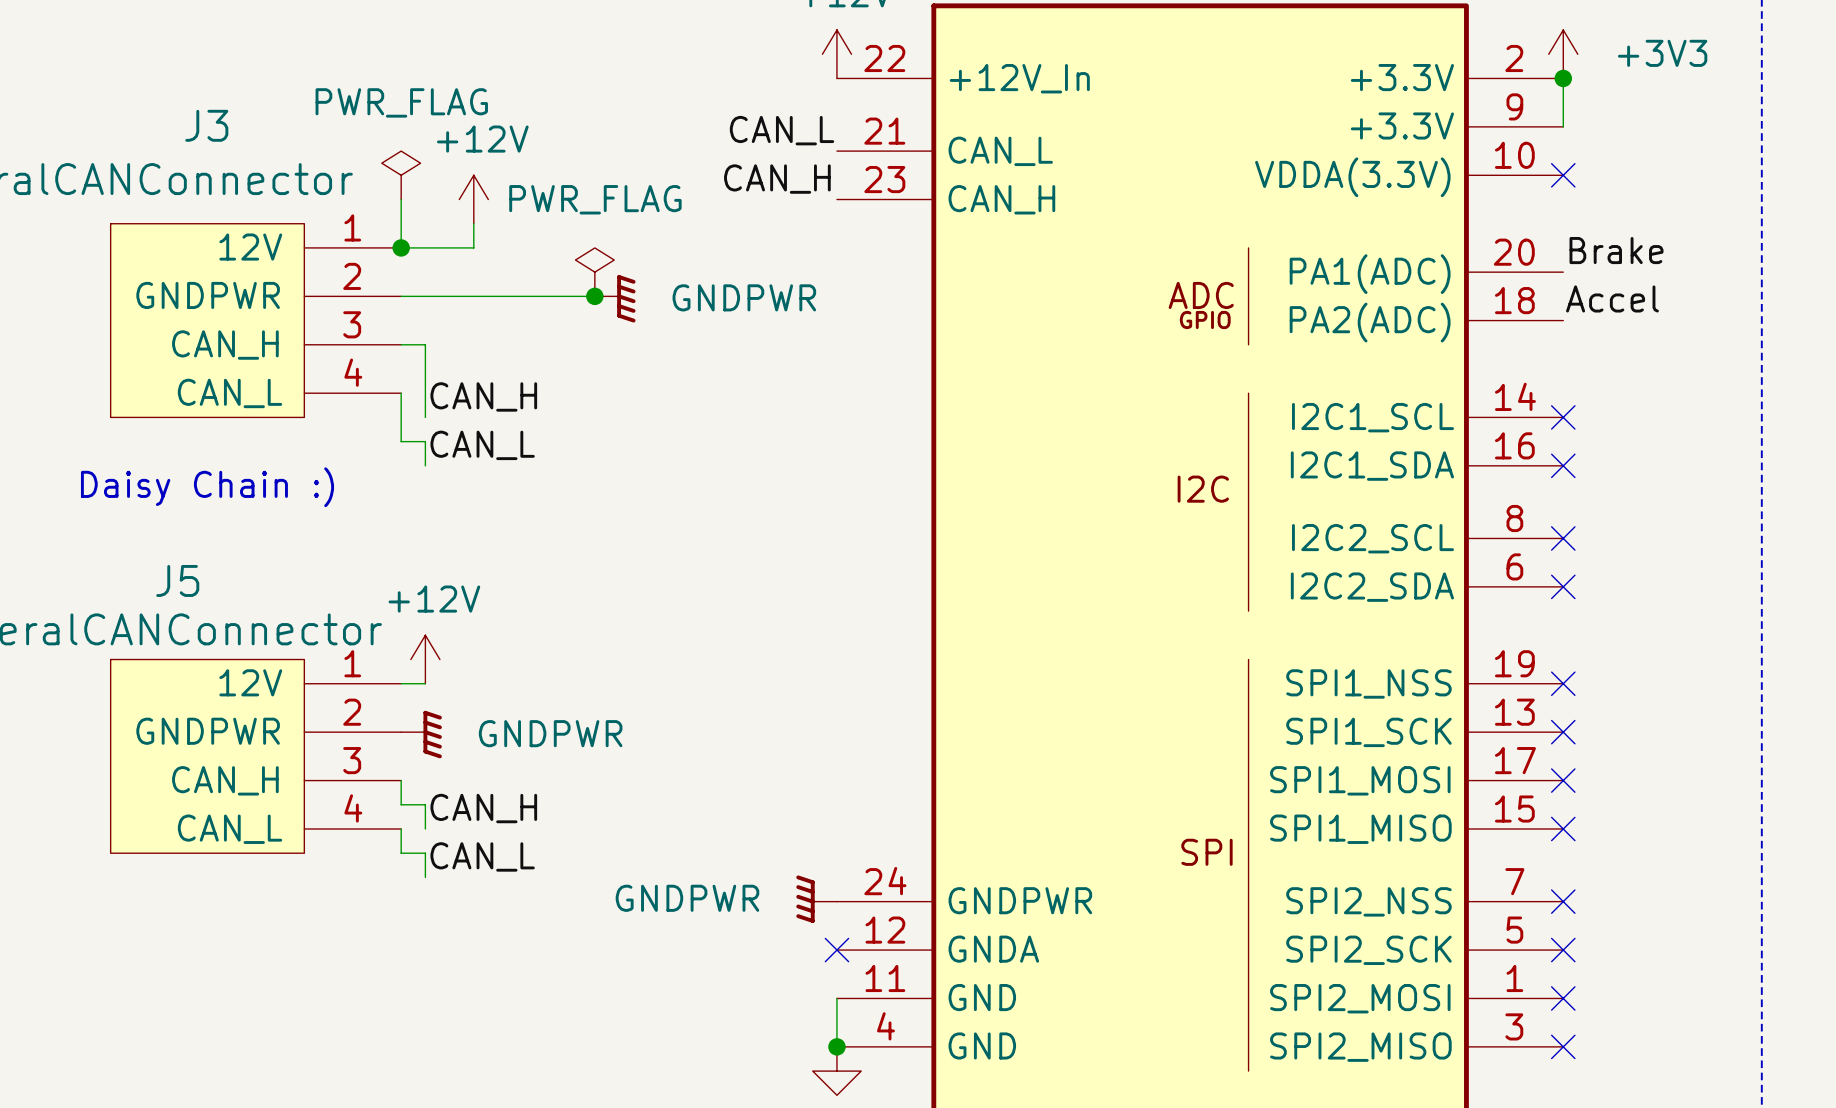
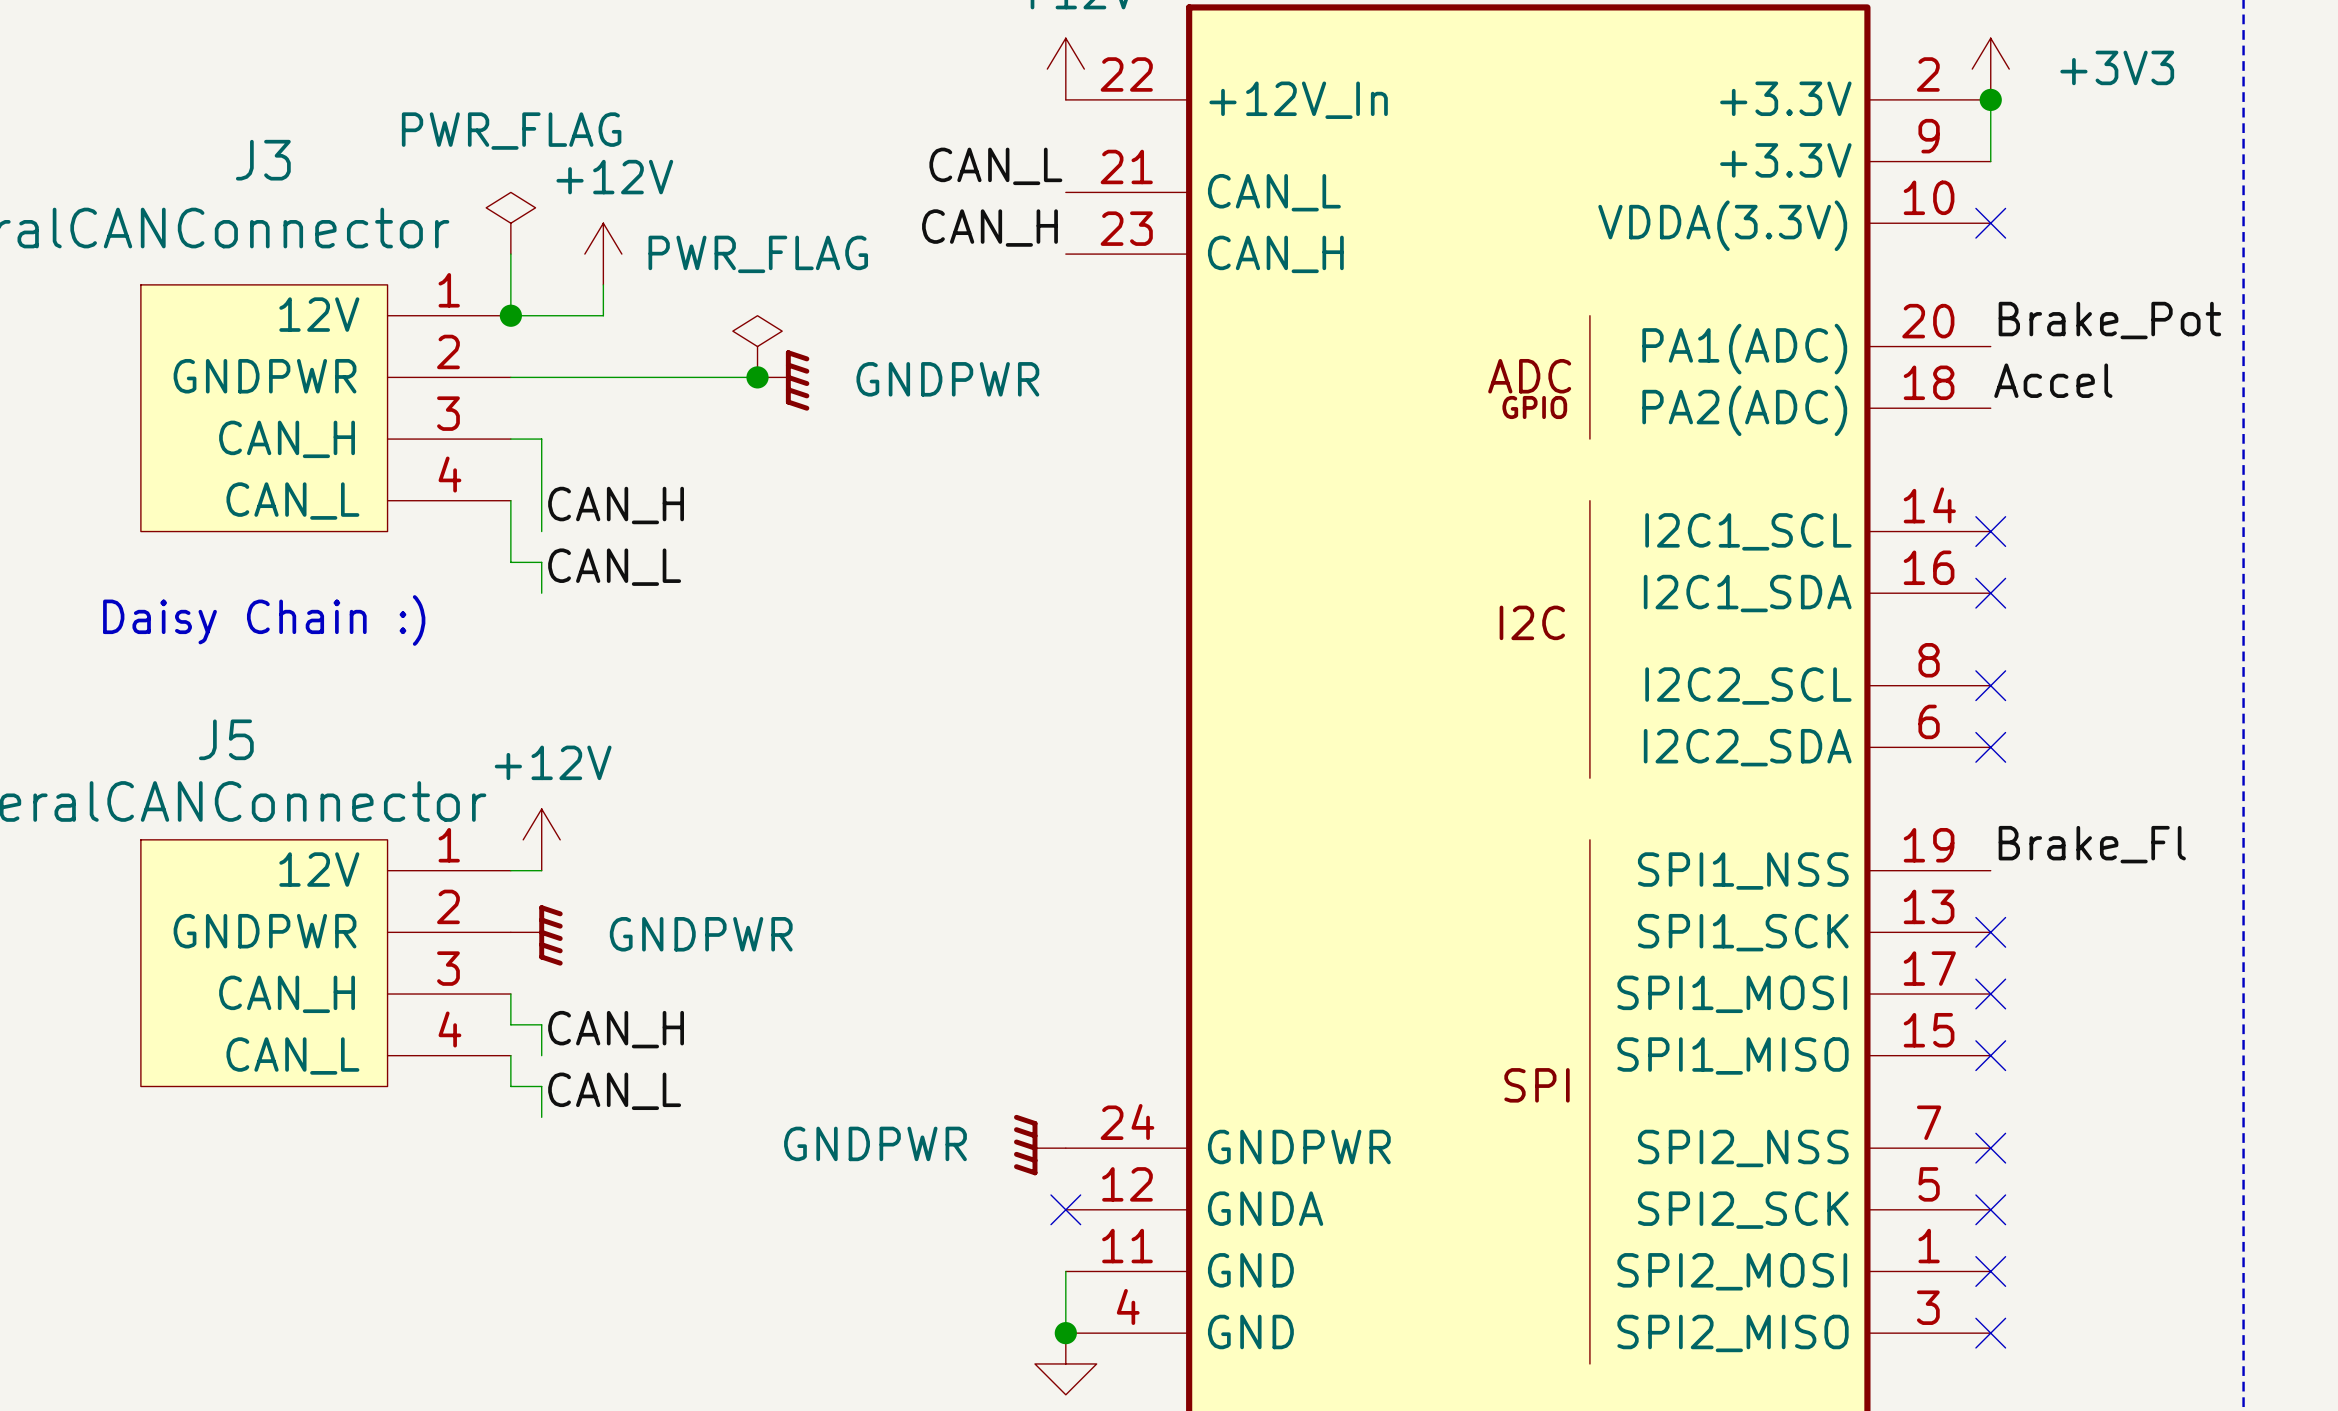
label: Brake (1616, 250) -> Brake_Pot (2109, 320)
label: none -> Brake_Fl (2092, 844)
no-connect mark: (1563, 683) -> none

